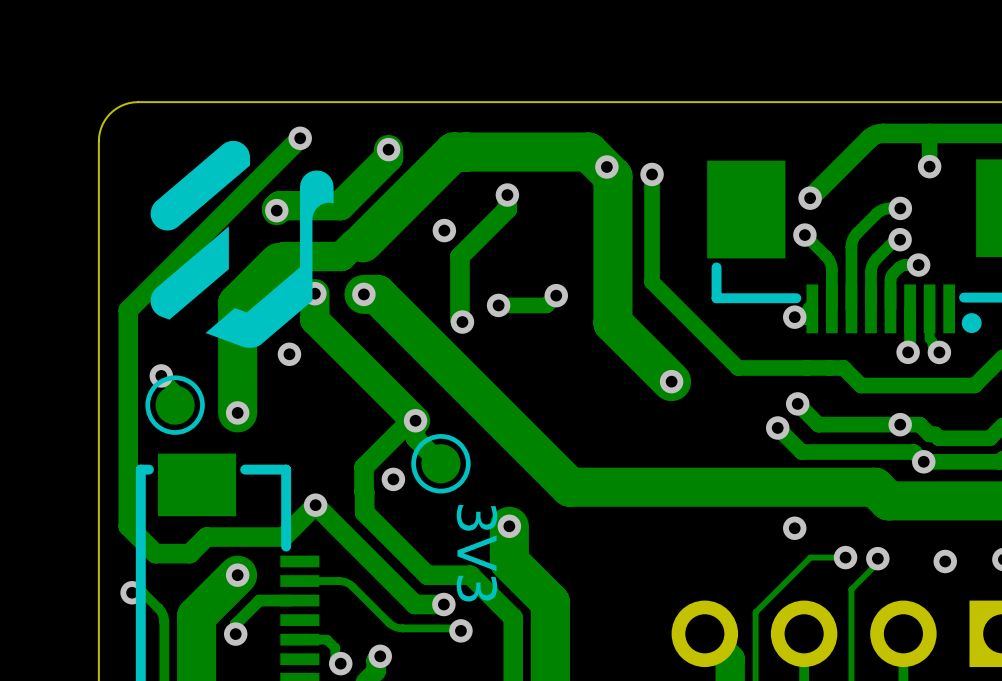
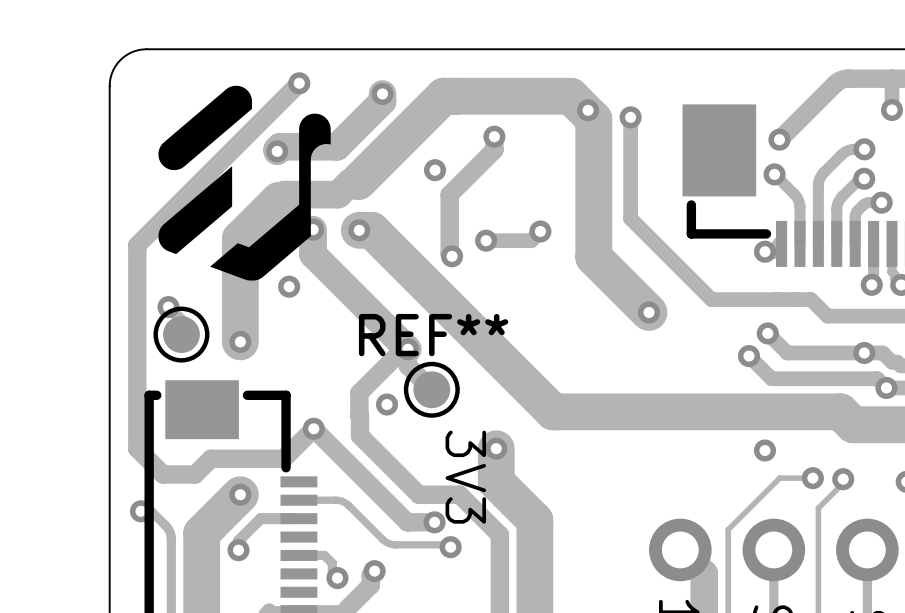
REF** name: none -> REF** (433, 335)

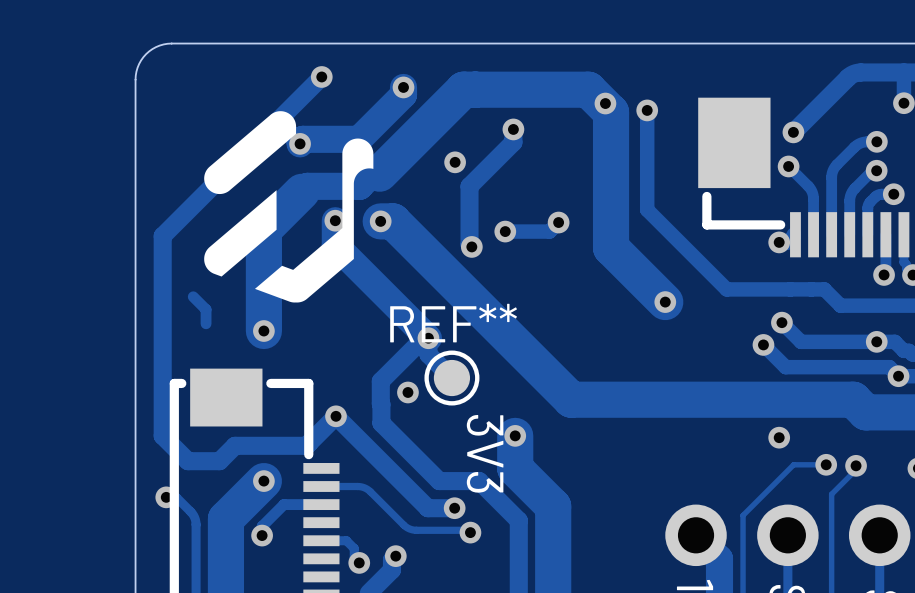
drawing position: (205, 127) -> (250, 152)
drawing position: (270, 197) -> (314, 220)
drawing position: (195, 210) -> (240, 233)
via: (168, 307) -> none
part: (181, 334) -> none

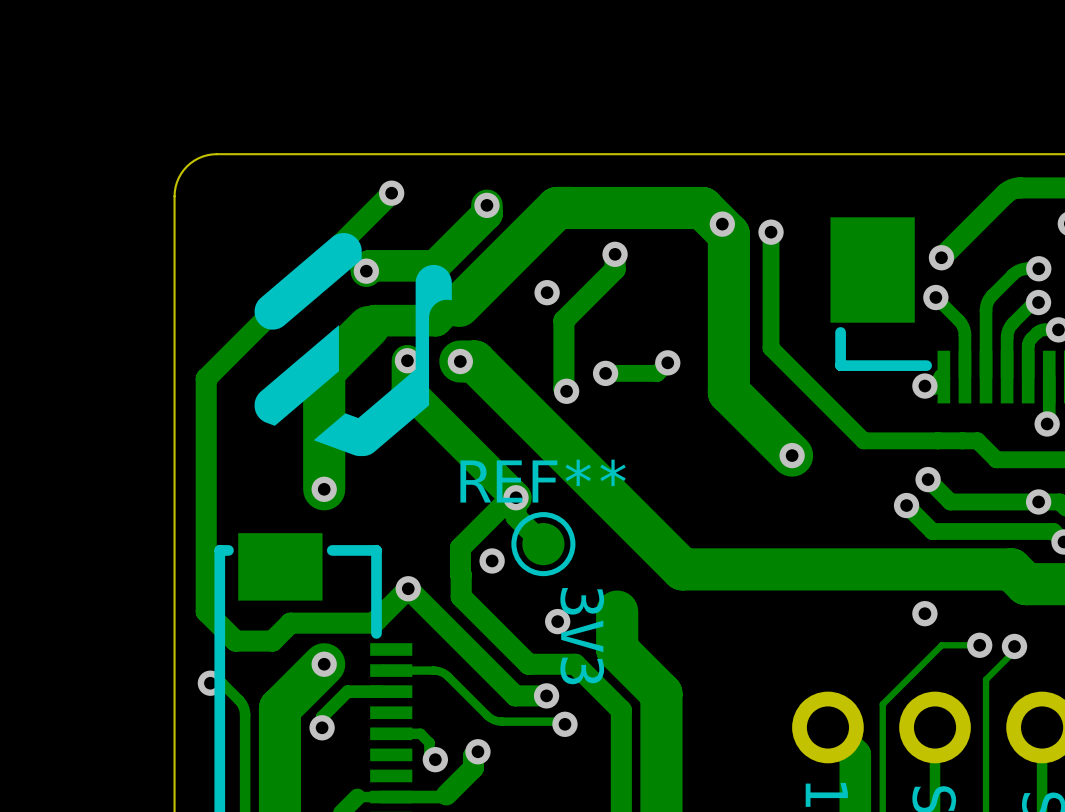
track: (193, 296) (206, 309) (206, 323) -> none
via position: (515, 435) -> (557, 621)

